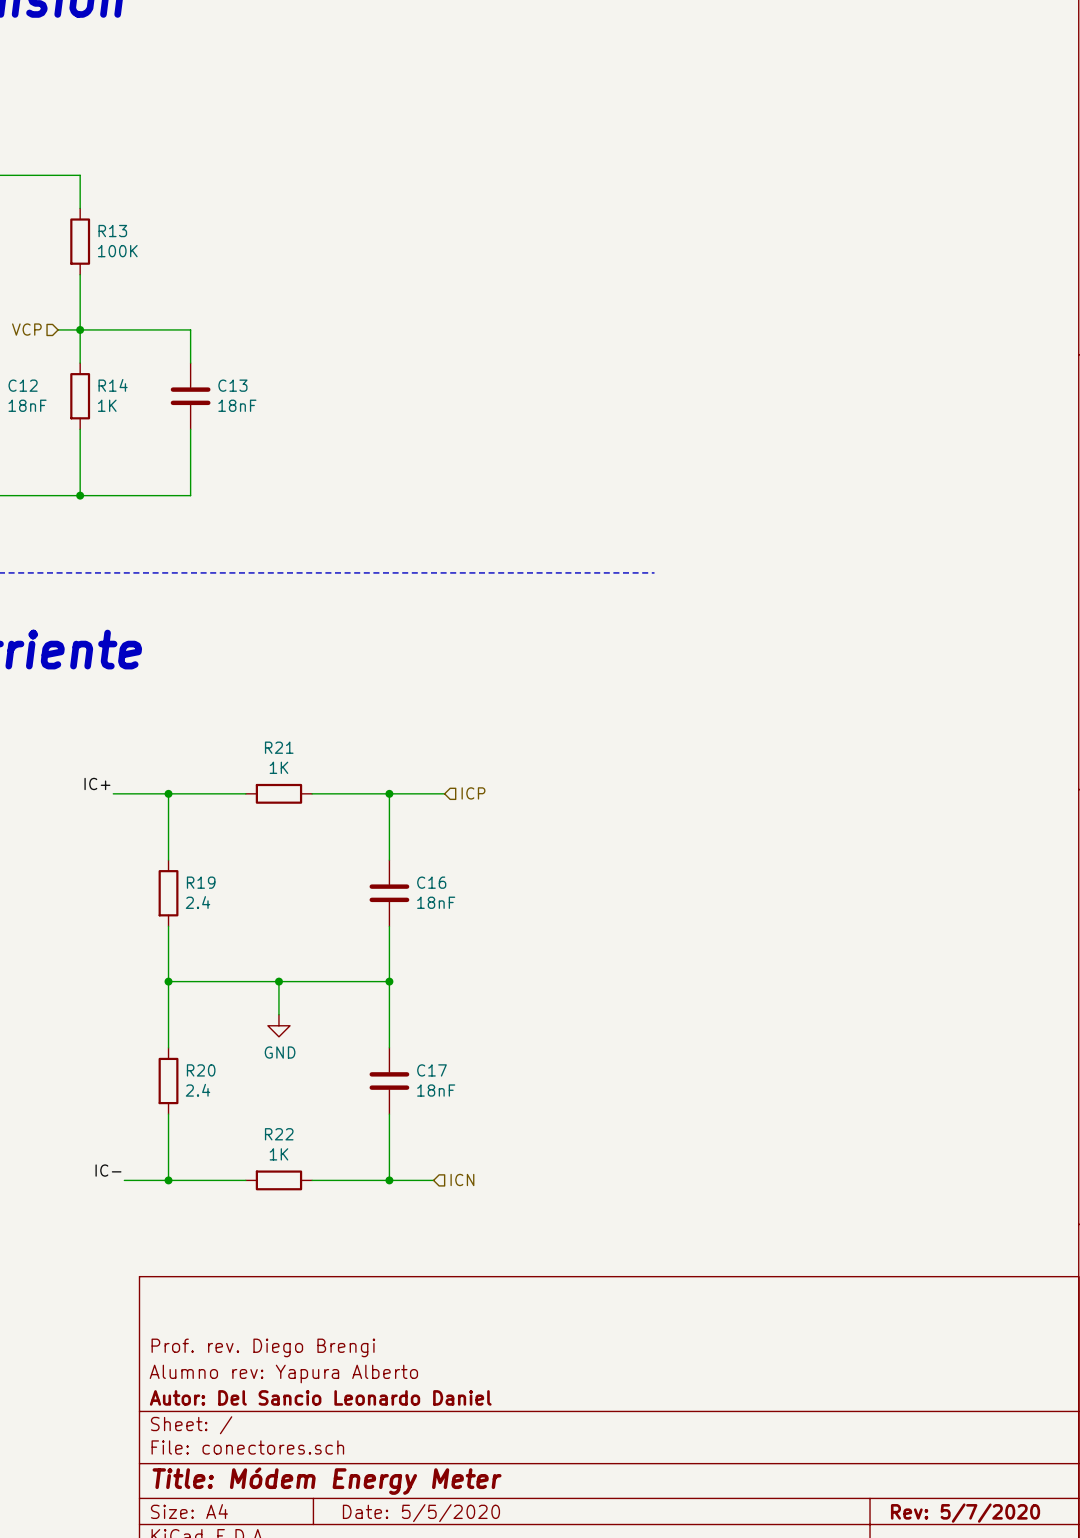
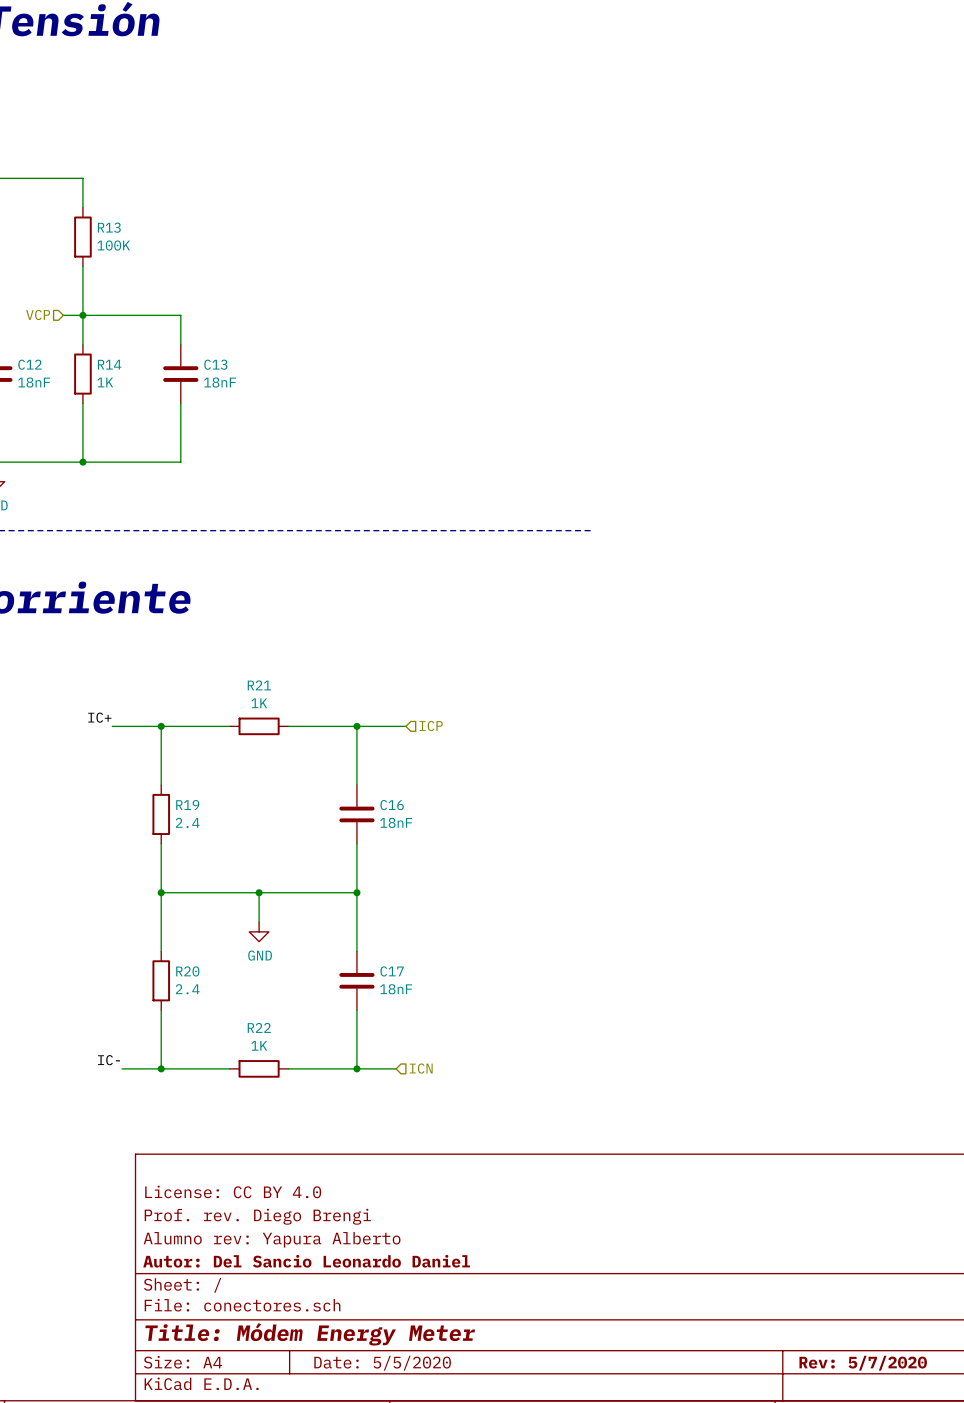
title block: none -> License: CC BY 4.0 (233, 1191)

